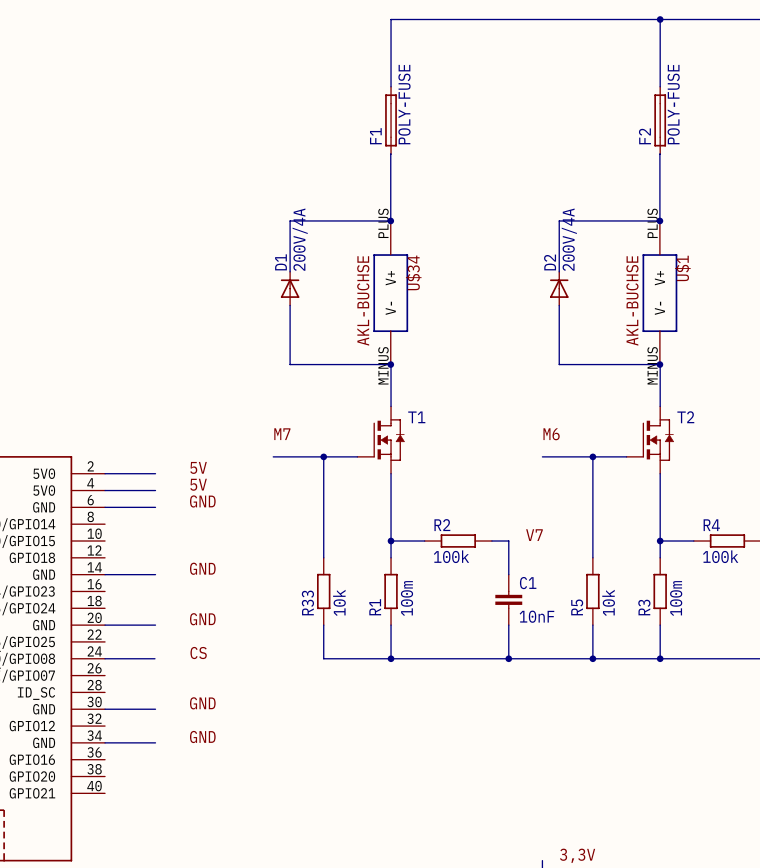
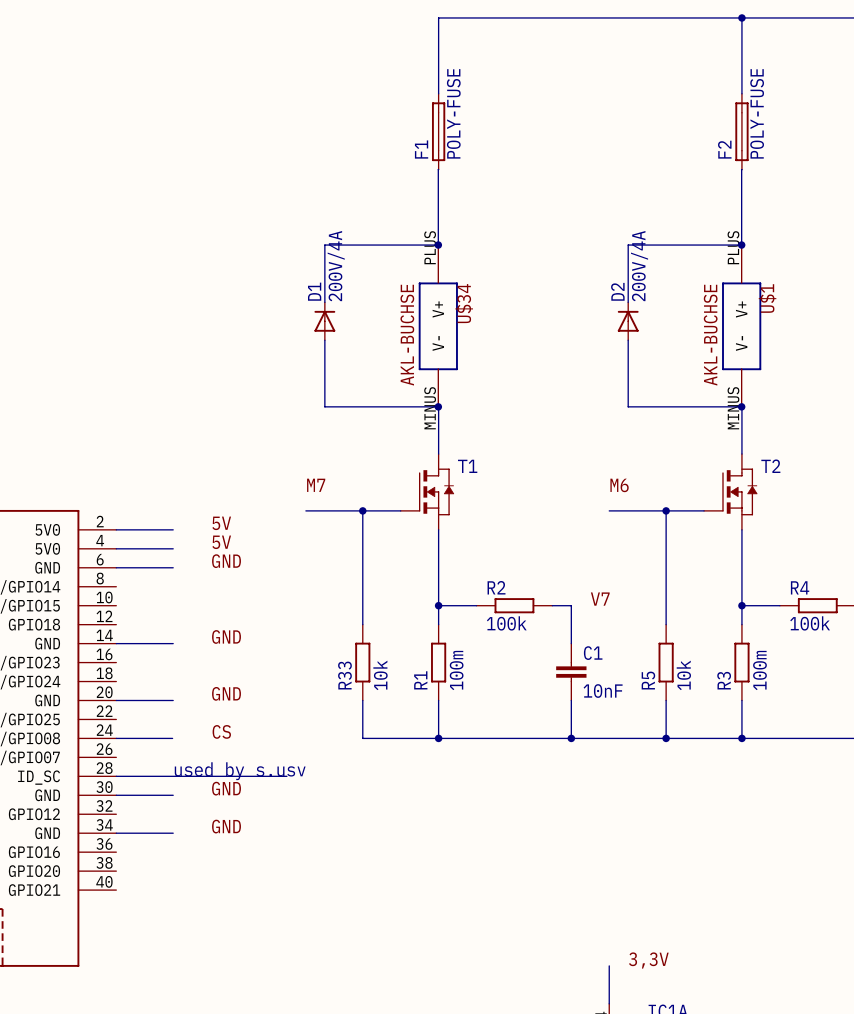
text: none -> used by s.usv (240, 771)
wire: none -> (116, 776) (286, 776)

